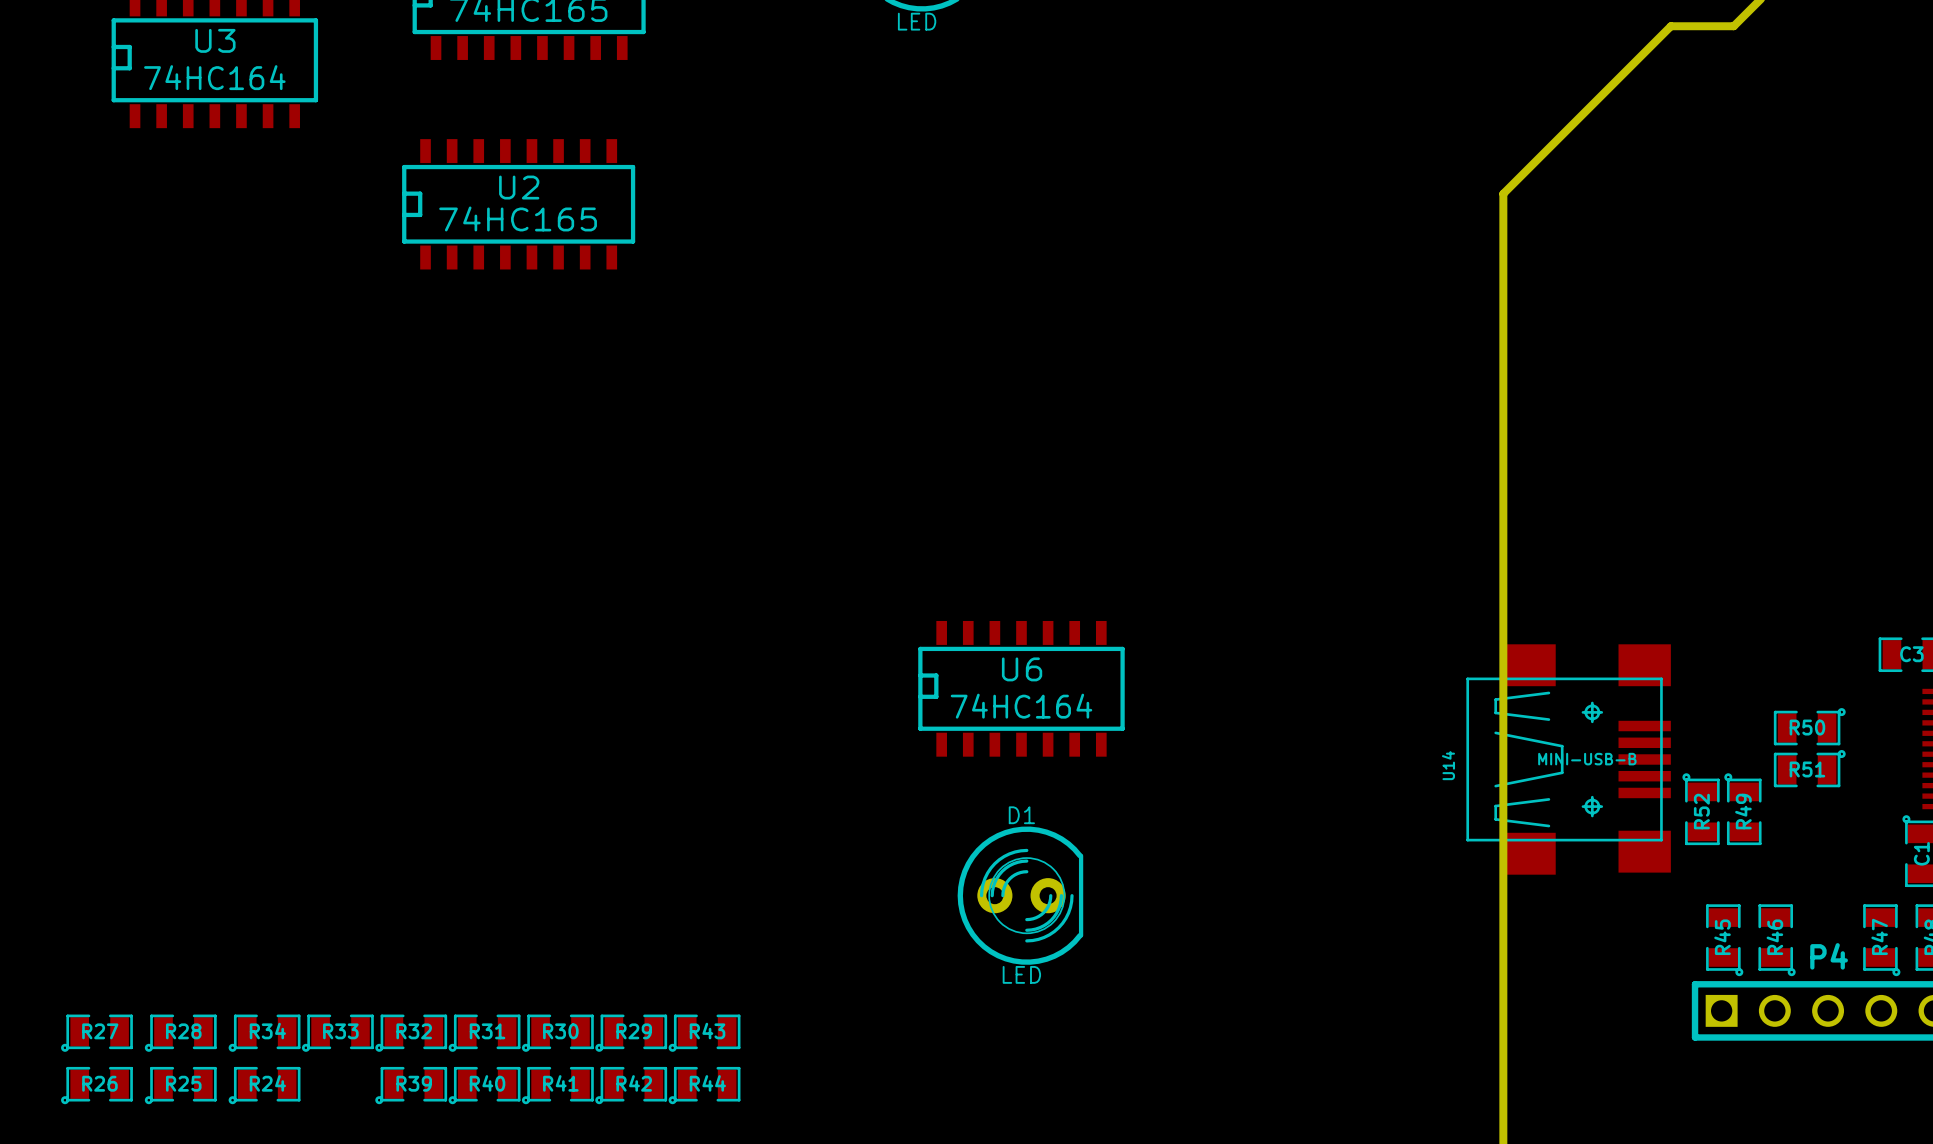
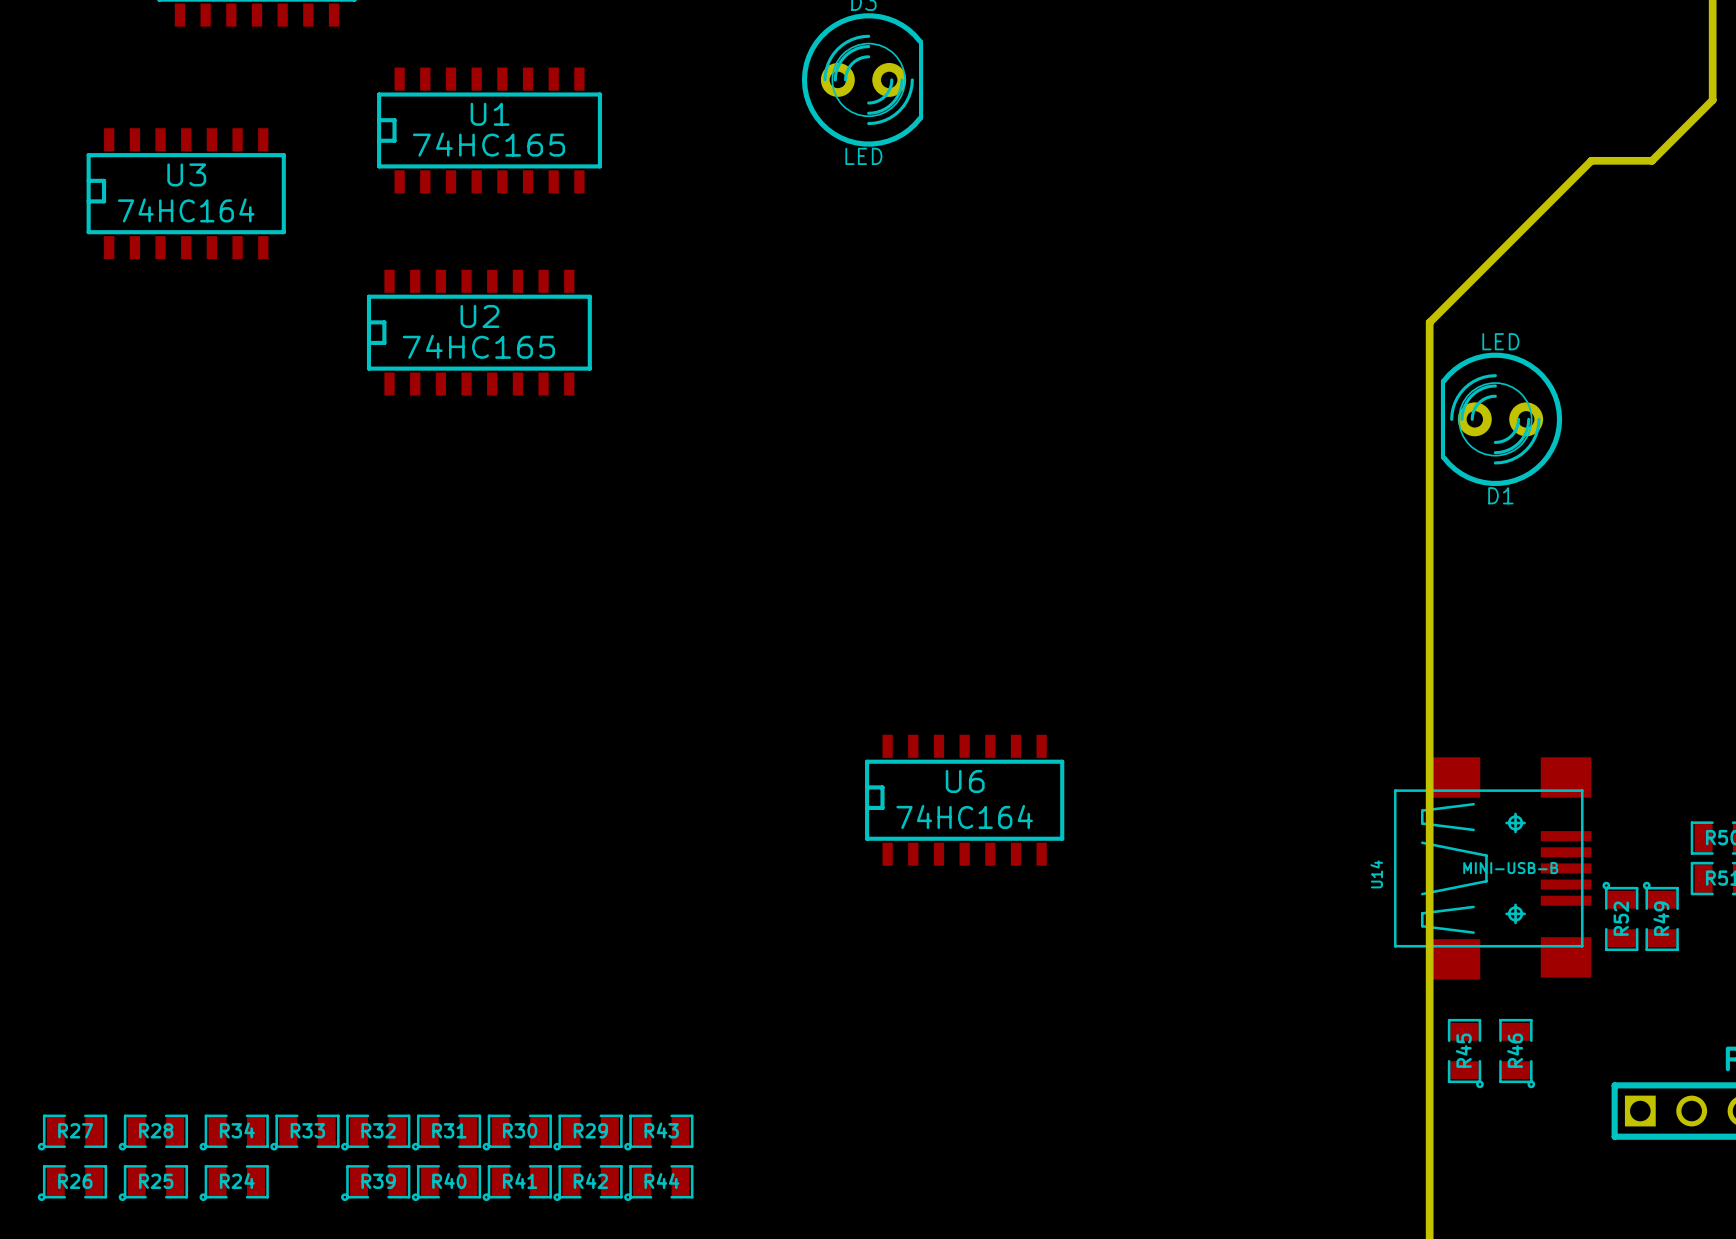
D1 rotation: 0° (1020, 895) -> 180° (1501, 419)
D1 position: (1020, 895) -> (1501, 419)
R45 position: (1724, 940) -> (1465, 1053)
R46 position: (1777, 940) -> (1517, 1053)

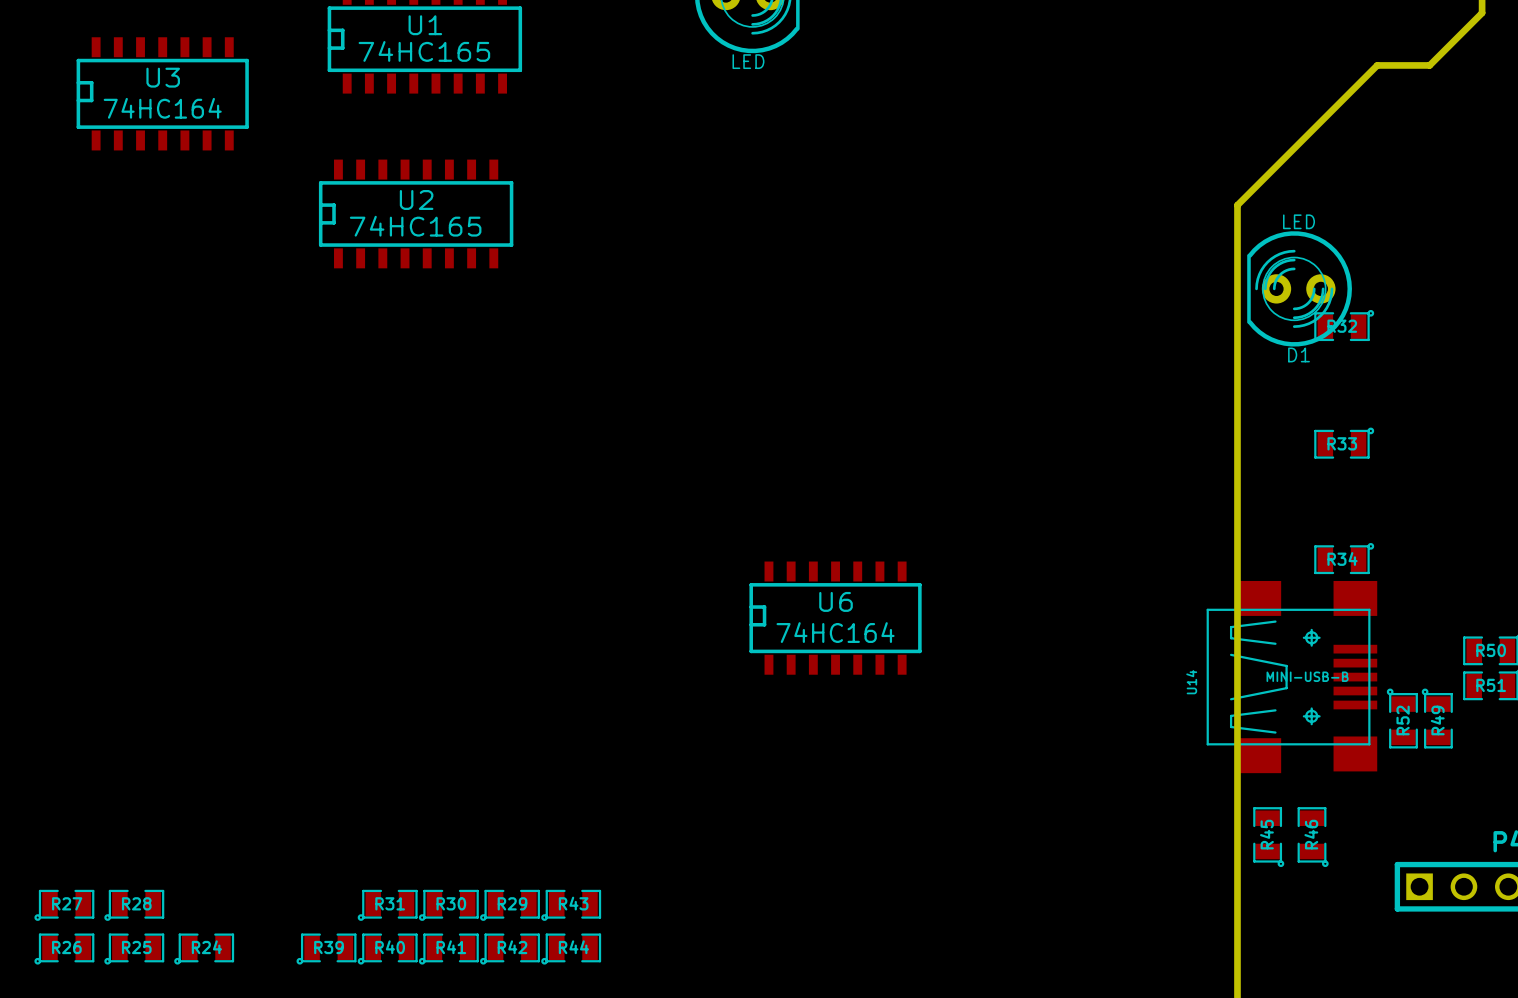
R34 rotation: 0° (234, 1132) -> 180° (1344, 558)
R34 position: (234, 1132) -> (1344, 558)
R33 rotation: 0° (304, 1132) -> 180° (1344, 443)
R33 position: (304, 1132) -> (1344, 443)
R32 rotation: 0° (375, 1132) -> 180° (1344, 325)
R32 position: (375, 1132) -> (1344, 325)

